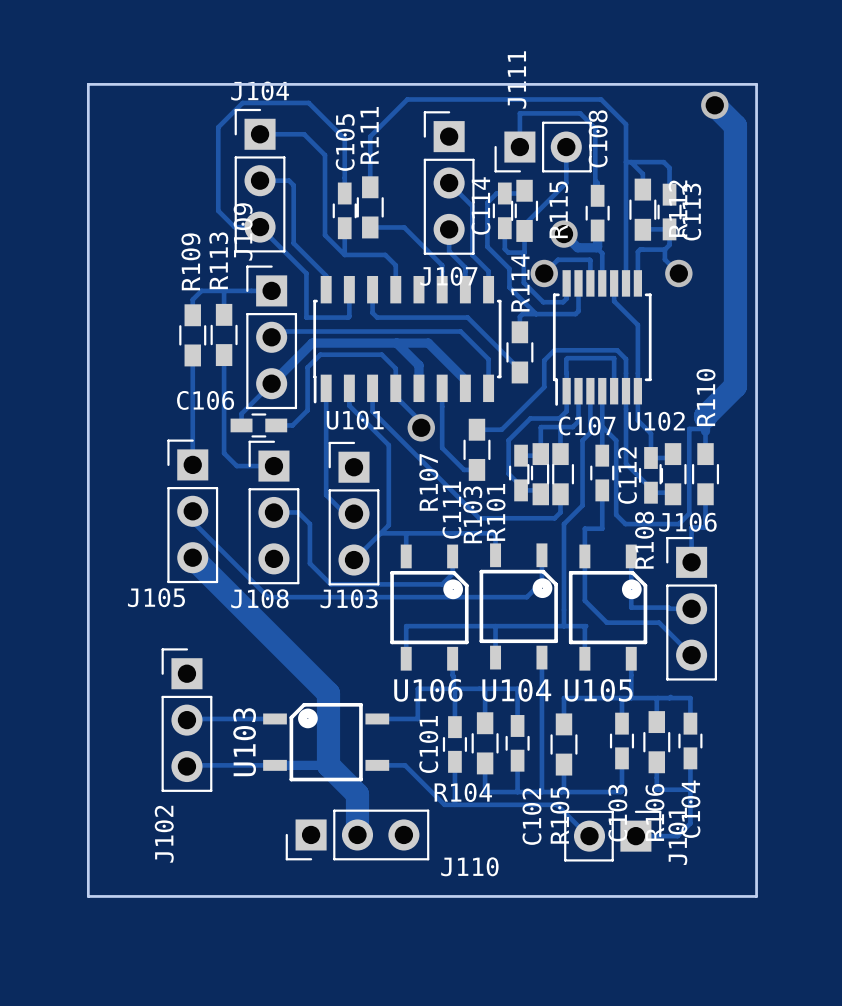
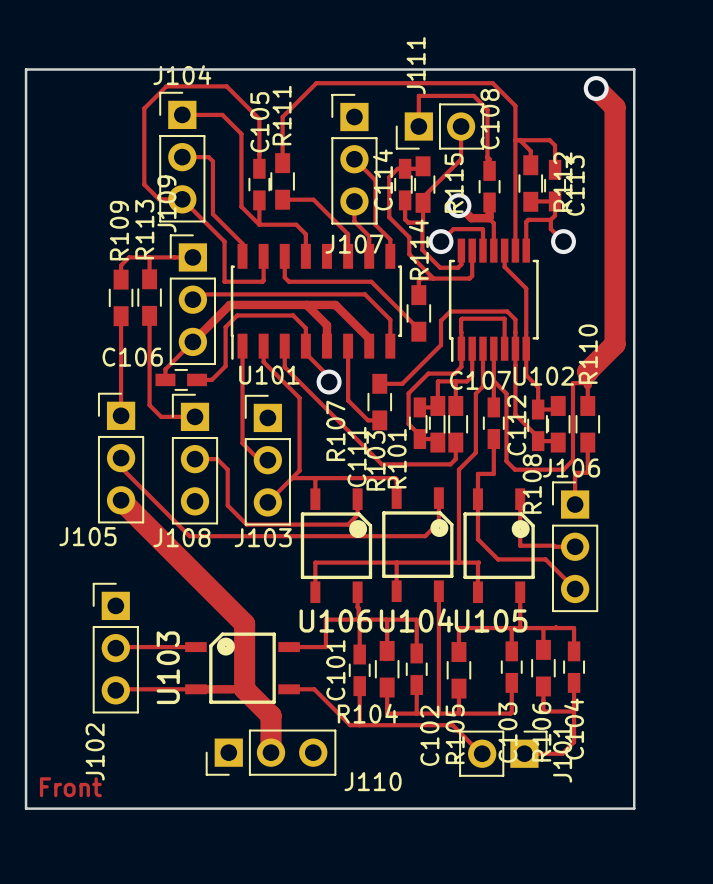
text: none -> Front (70, 787)

